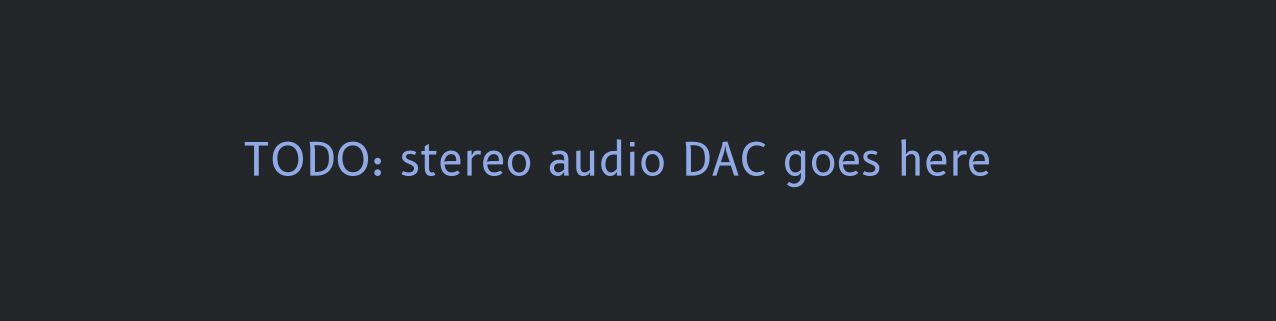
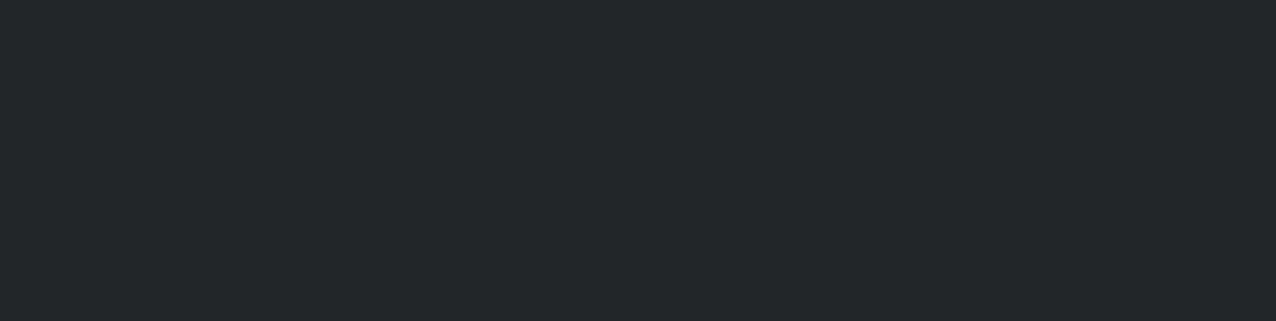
text: TODO: stereo audio DAC goes here (616, 163) -> none

